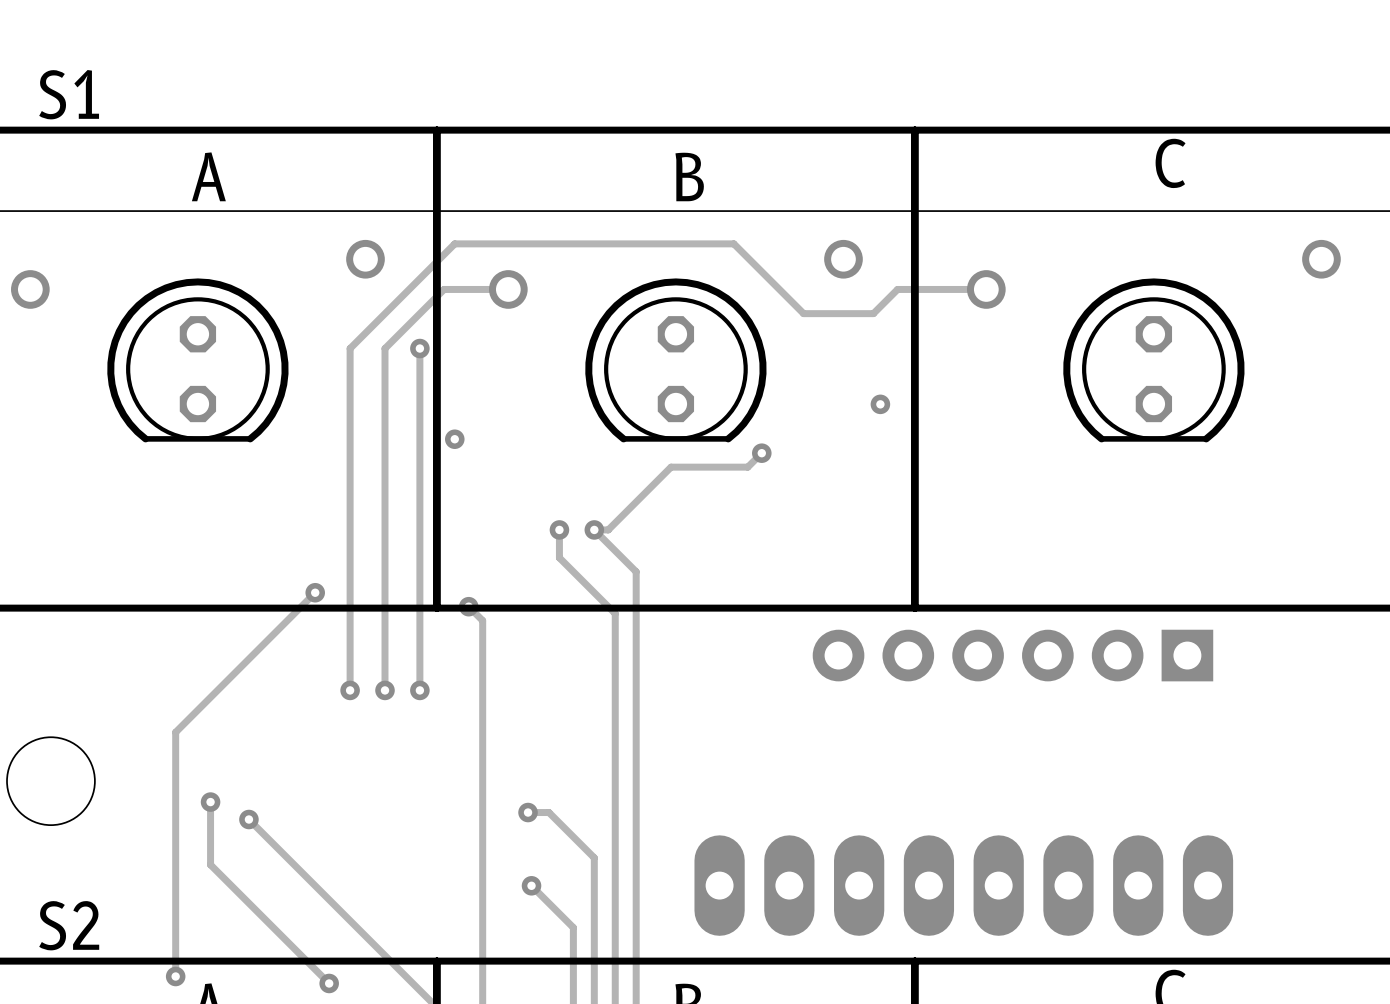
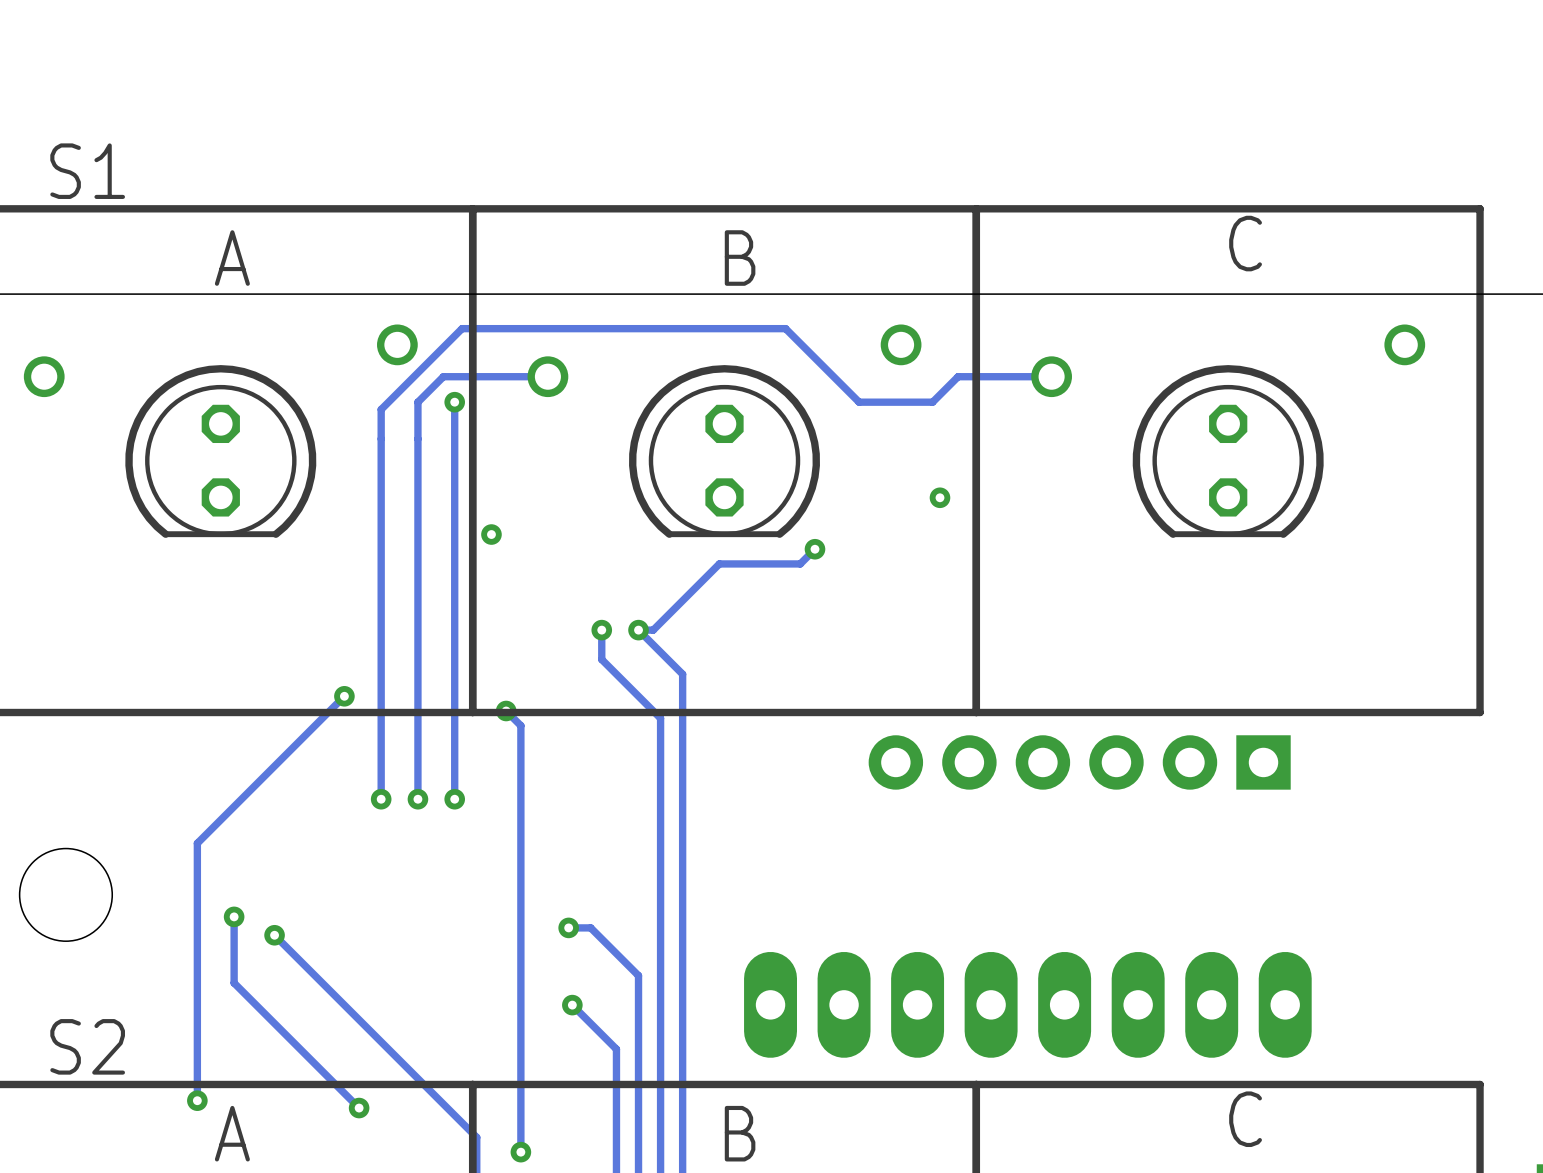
track: (454, 243) (409, 289) -> (480, 376) (443, 376)
track: none -> (491, 328) (462, 328) (381, 409) (381, 438)
track: (444, 289) (385, 348) -> none
track: (385, 313) (350, 348) -> (417, 402) (417, 438)
track: none -> (454, 402) (454, 438)
via position: (419, 348) -> (454, 402)

